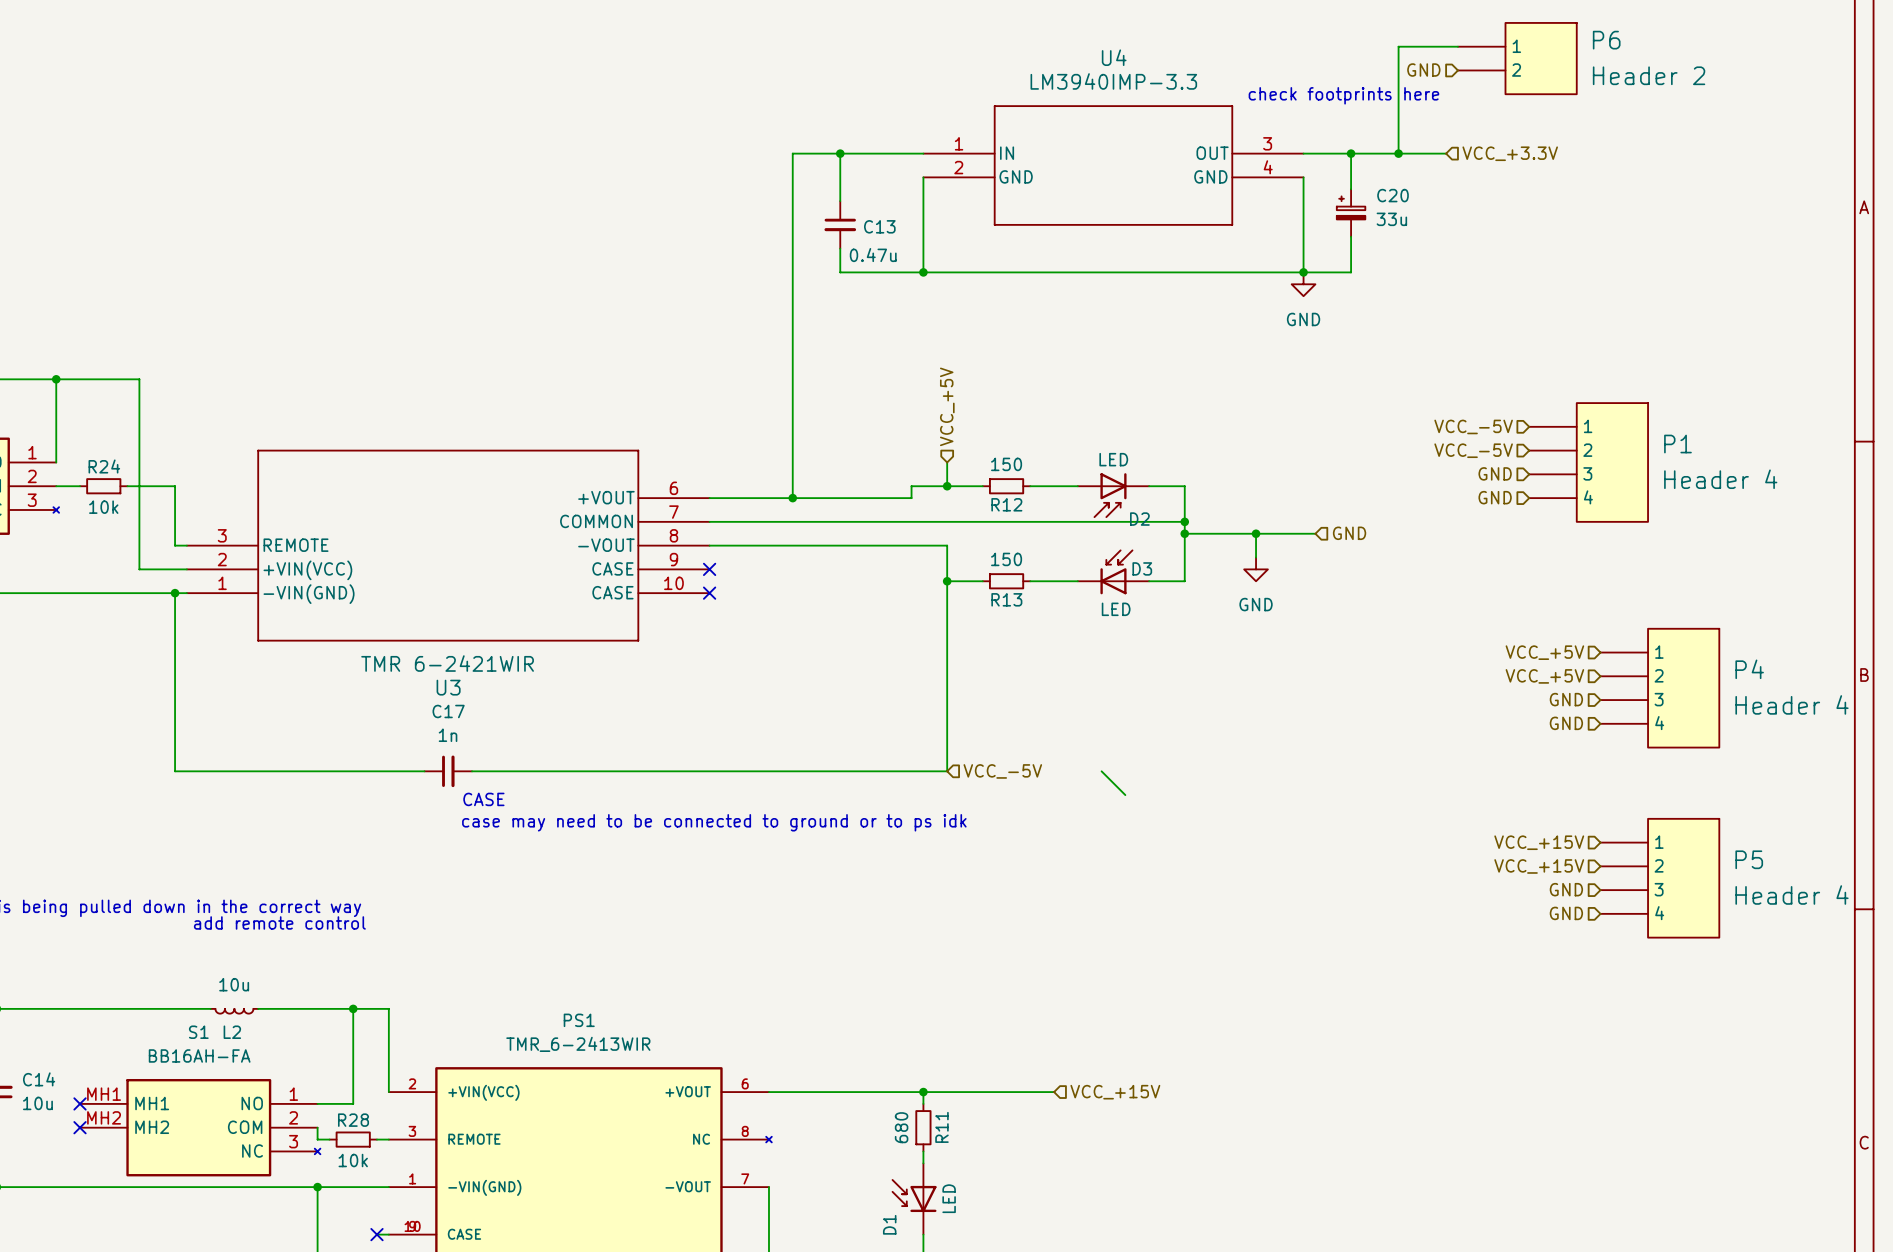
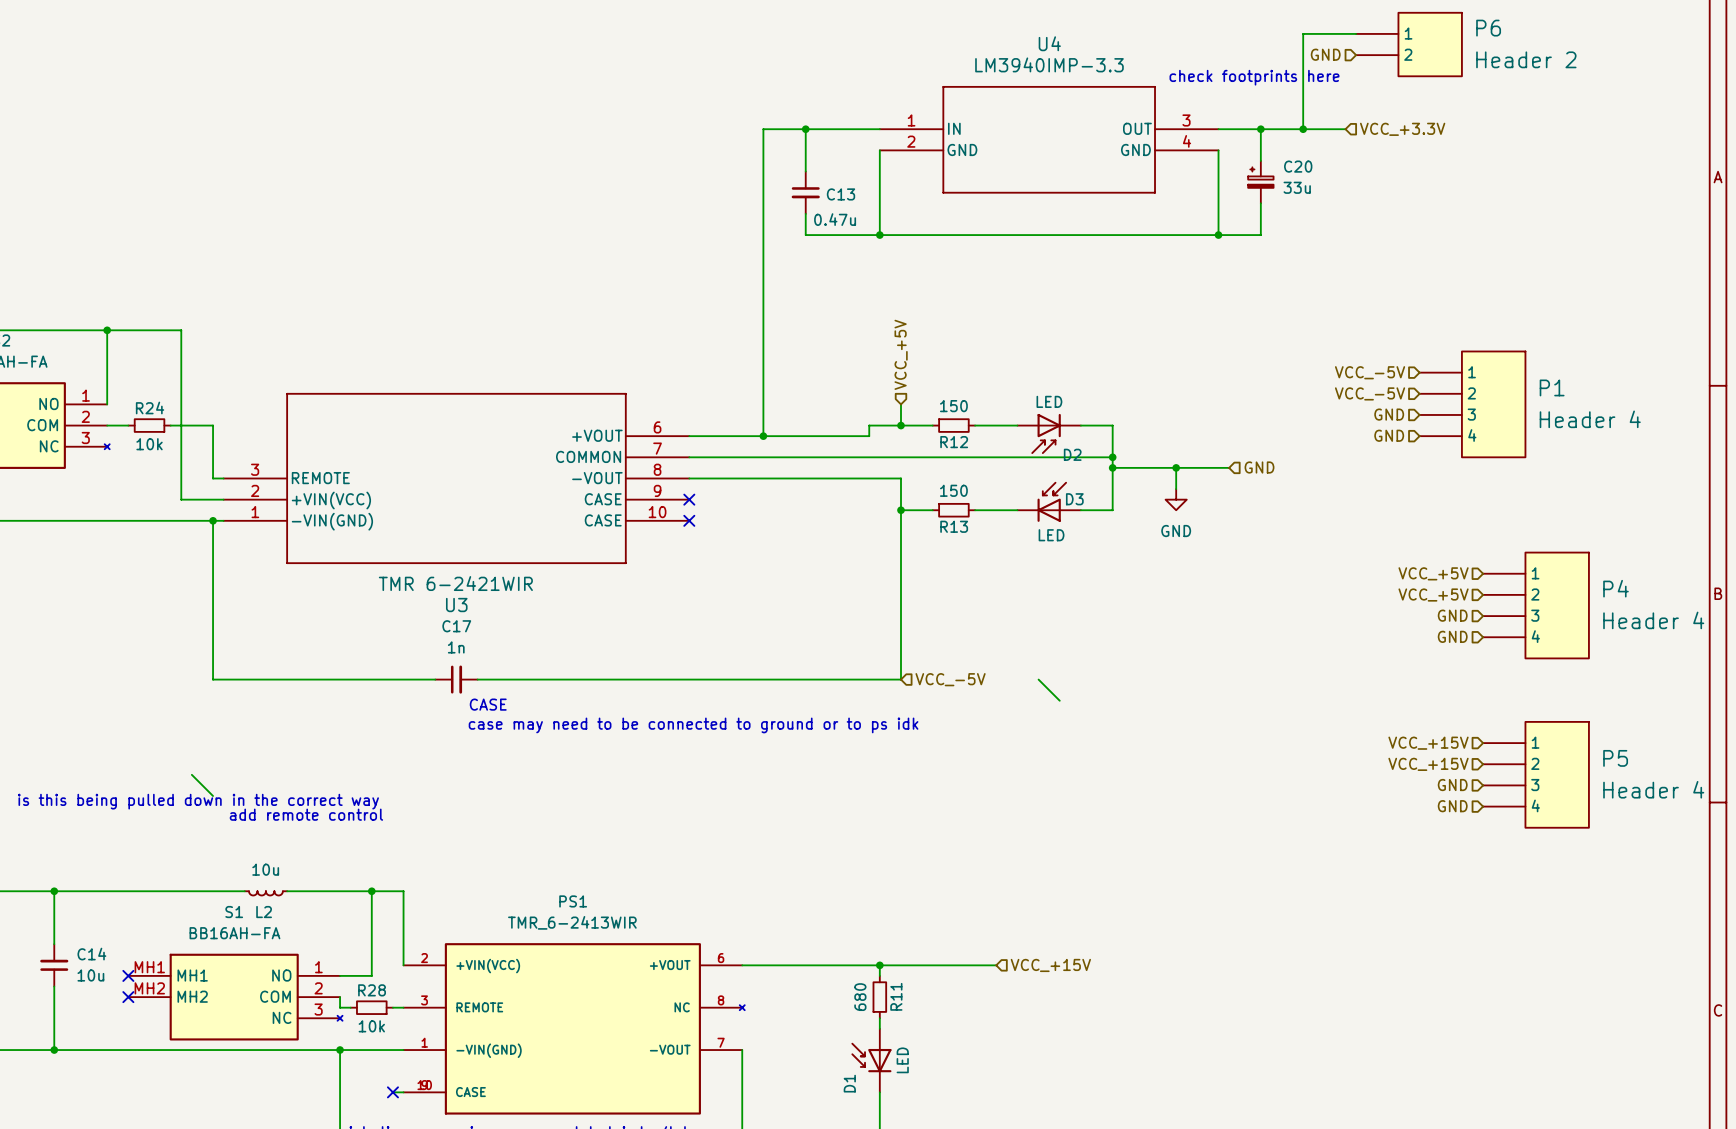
power symbol: GND (1303, 284) -> none
wire: none -> (191, 774) (213, 796)

